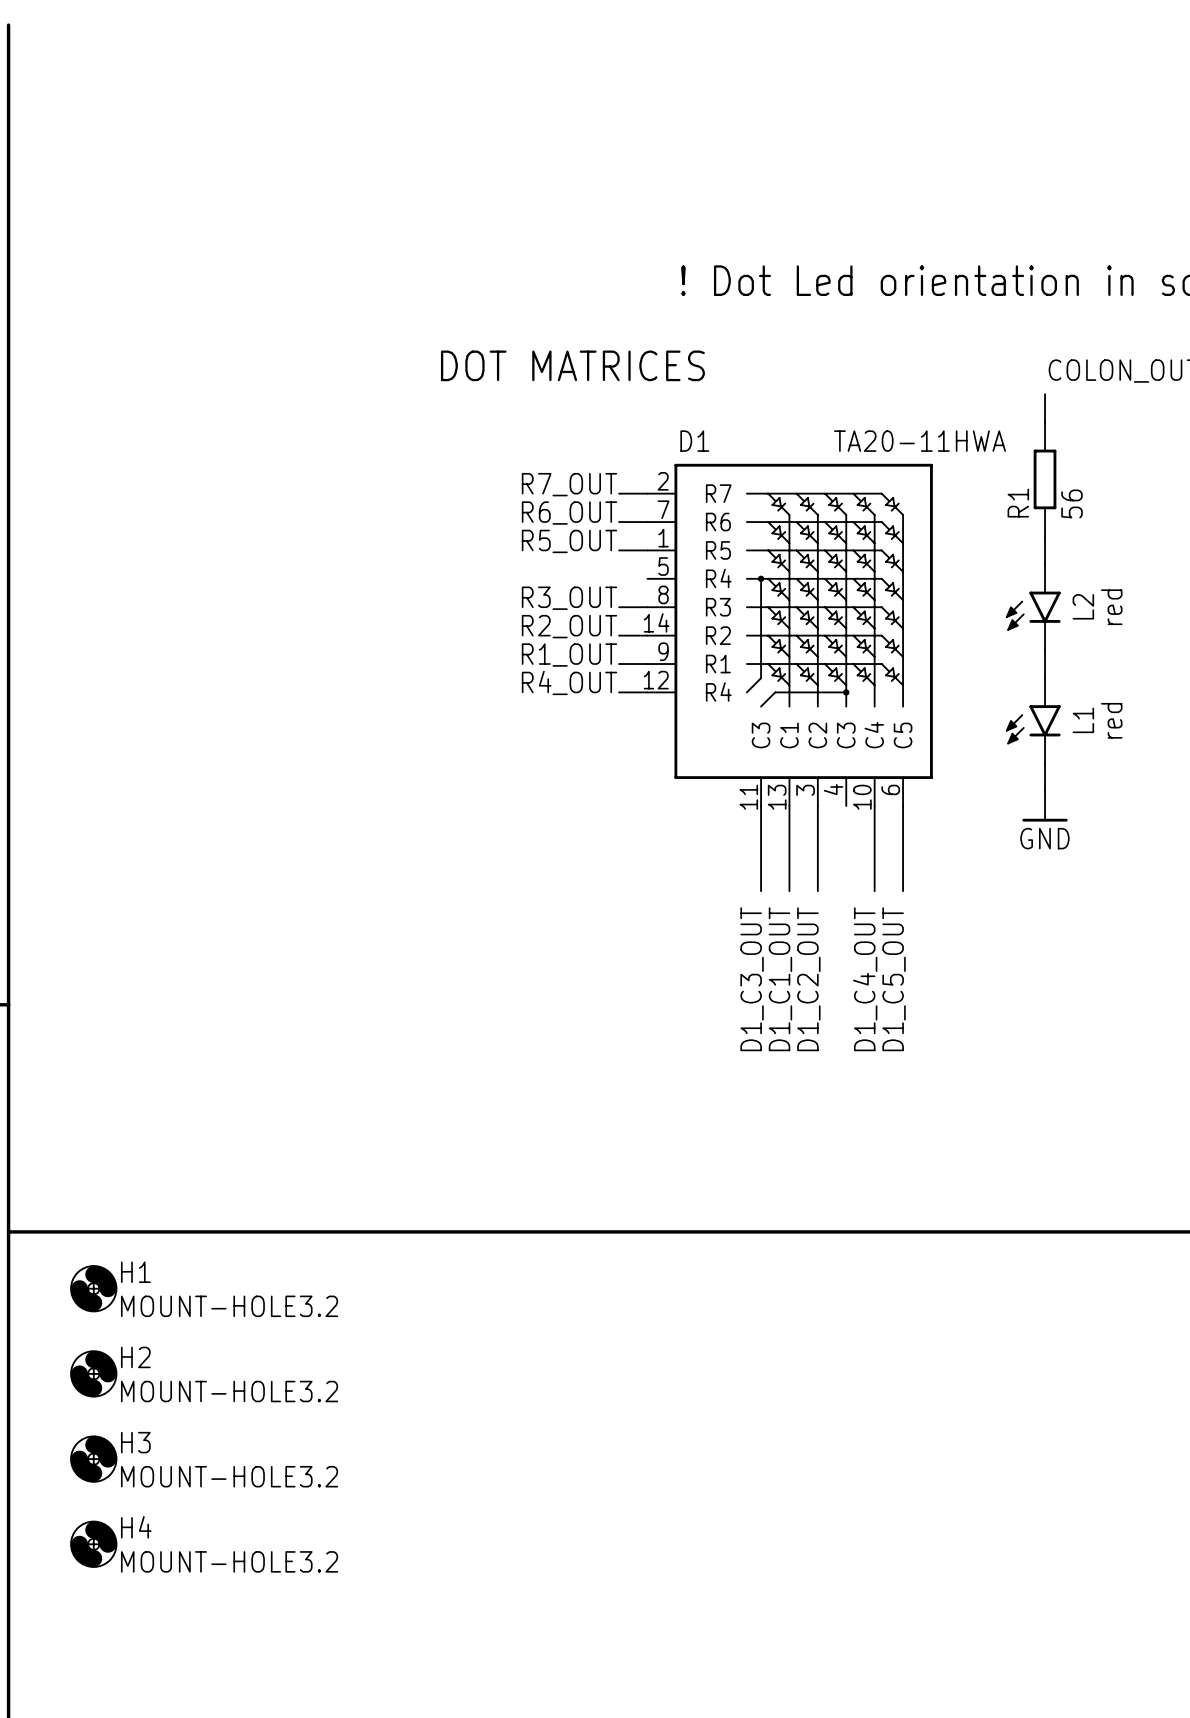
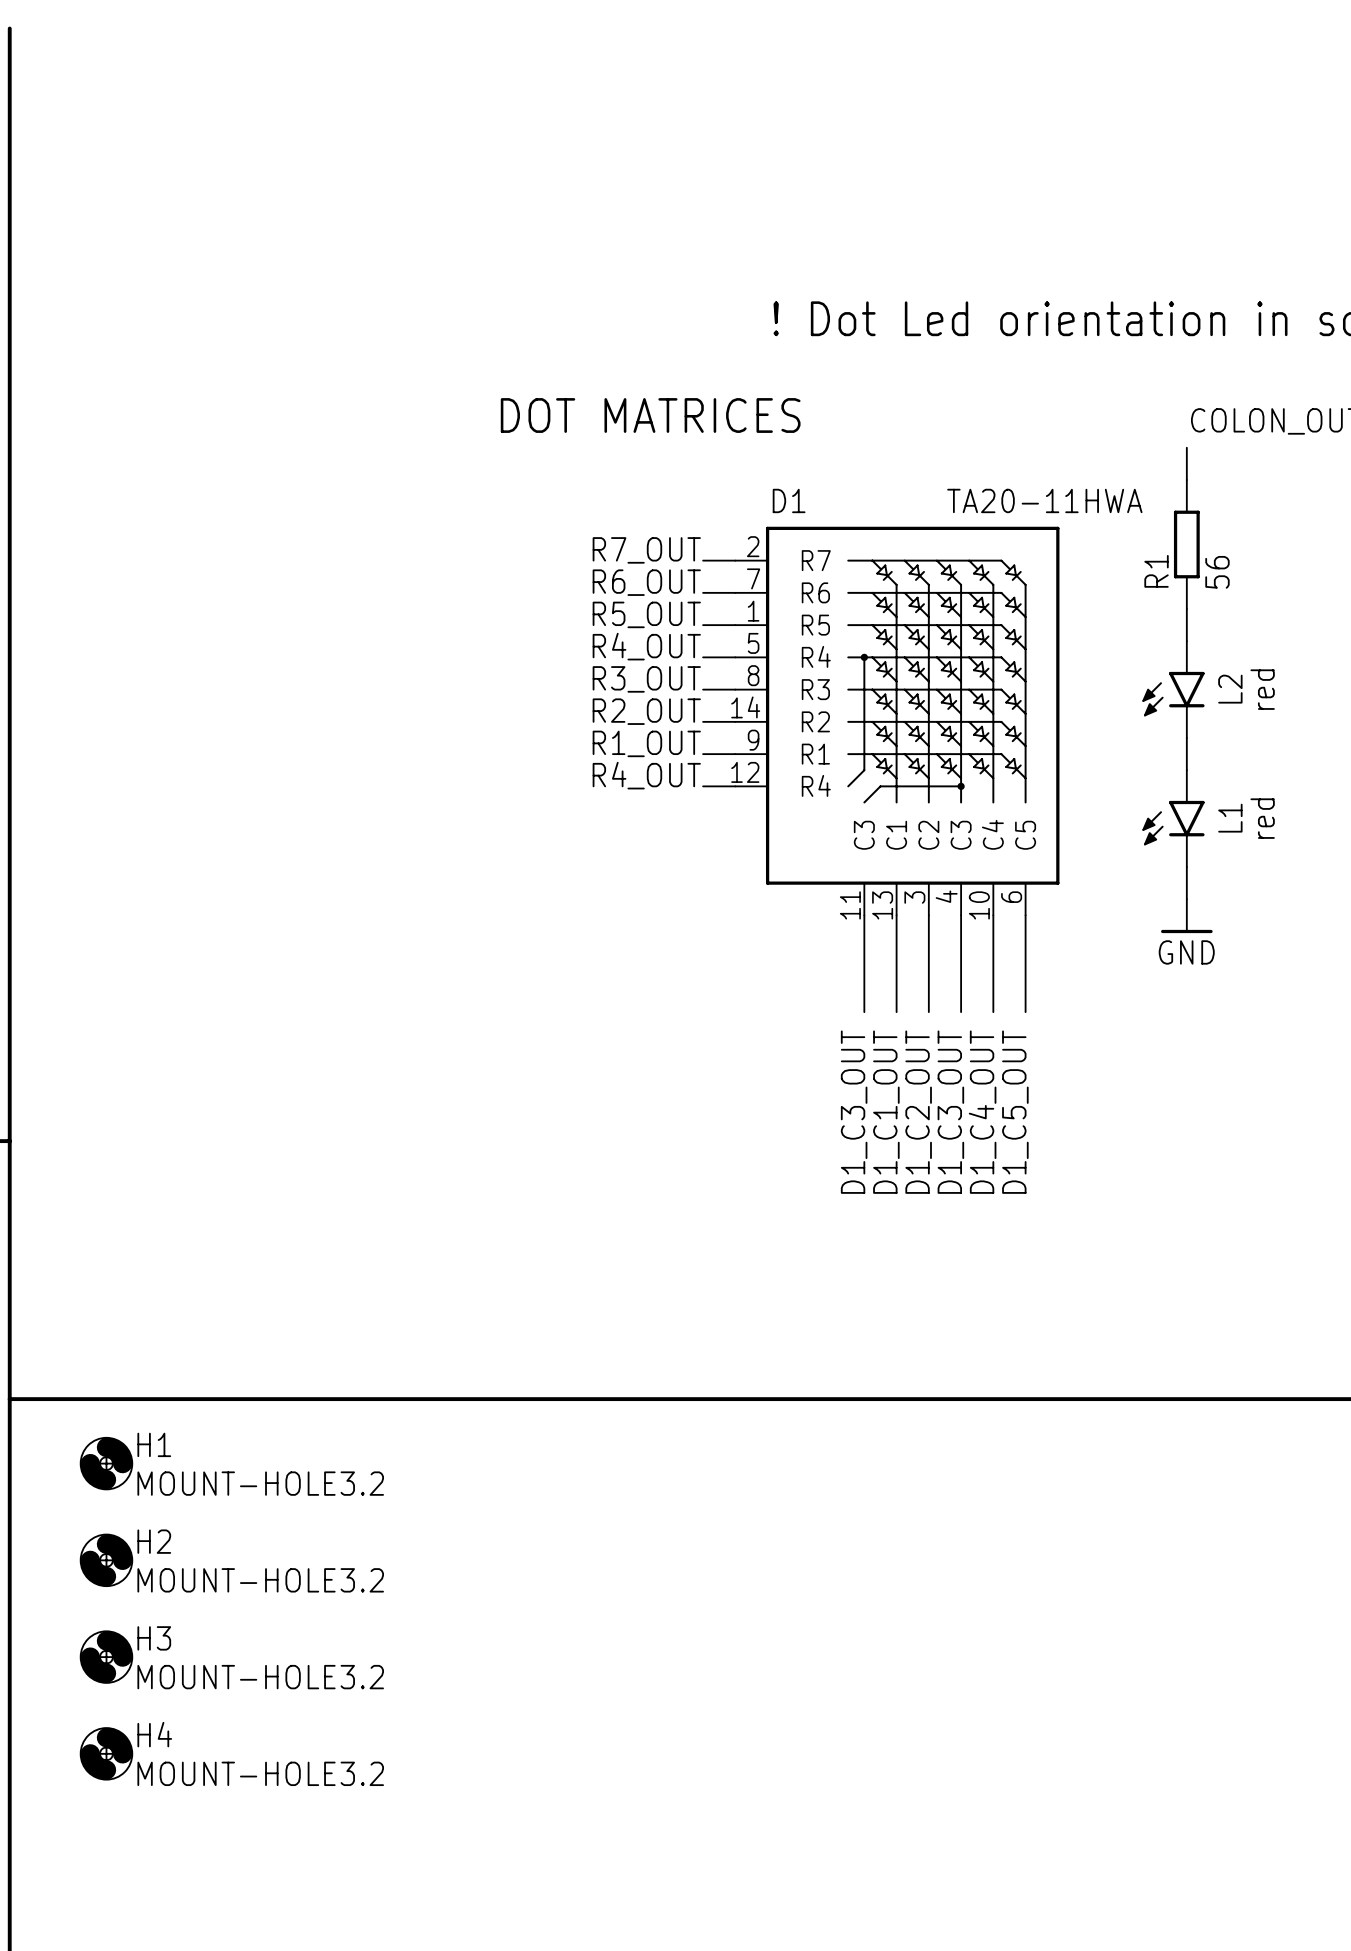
label: none -> R4_OUT (646, 646)
wire: none -> (703, 657) (735, 657)
wire: none -> (961, 915) (961, 1012)
label: none -> D1_C3_OUT (950, 1112)

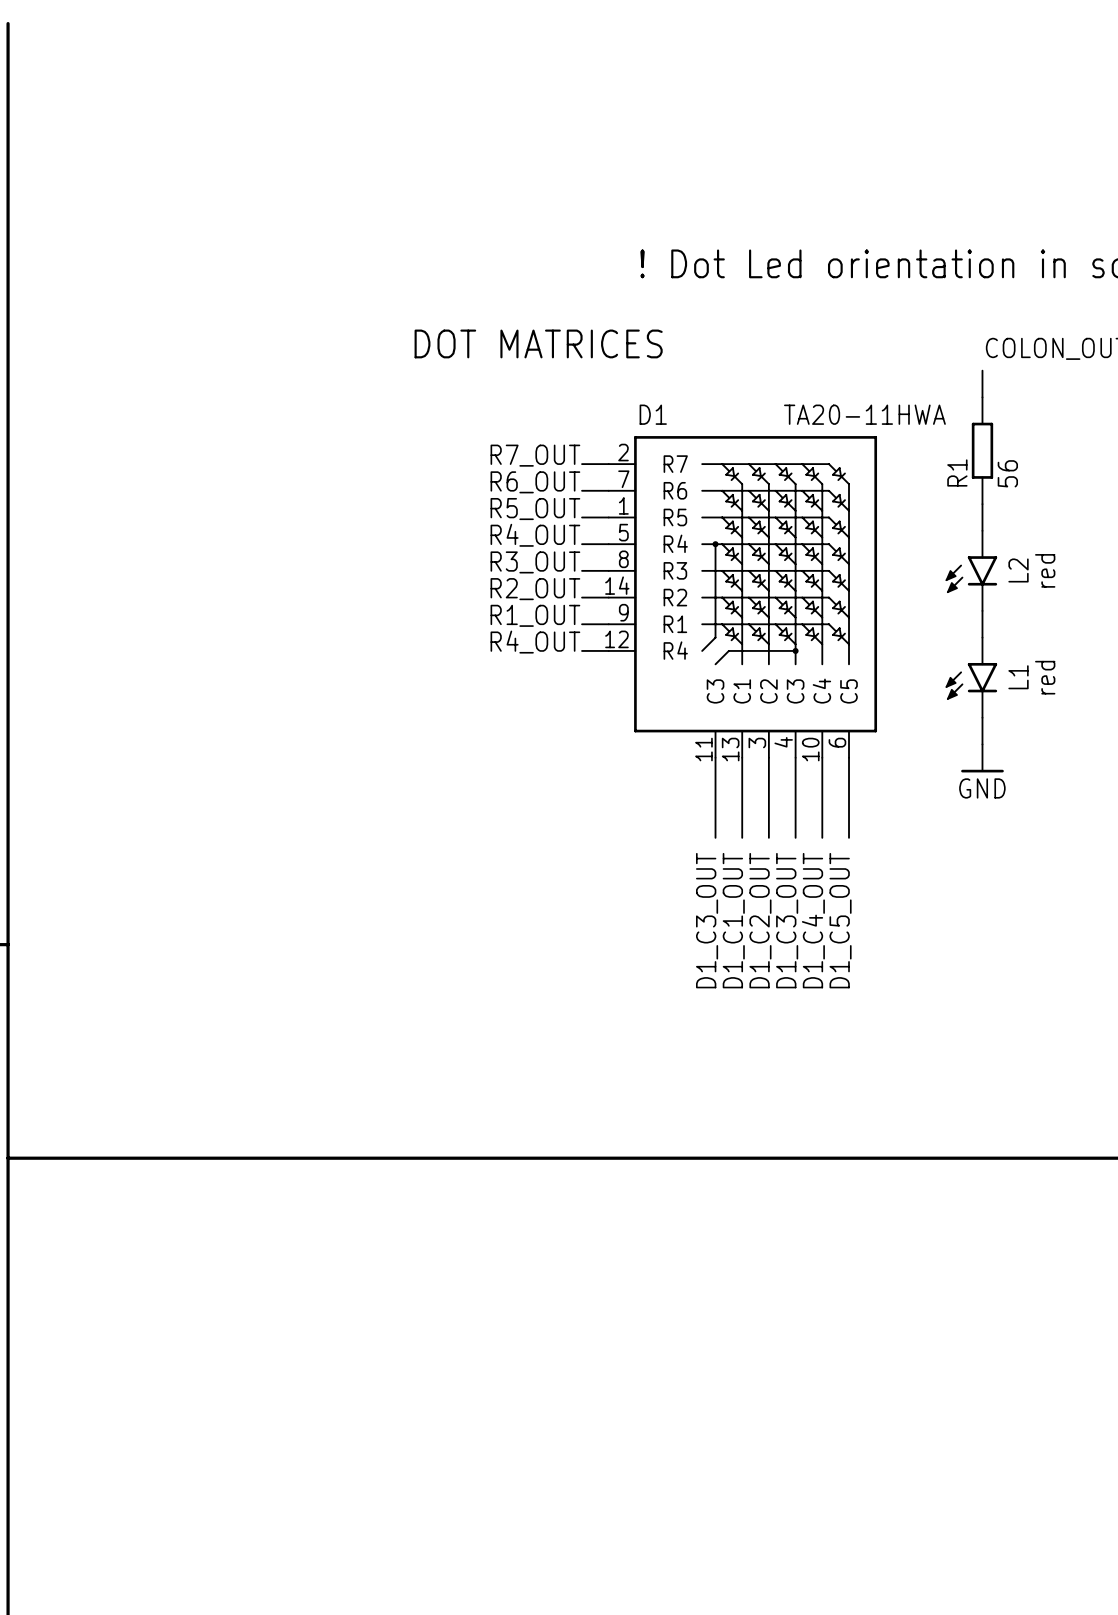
H1: MOUNT-HOLE3.2 (106, 1463) -> none
H2: MOUNT-HOLE3.2 (106, 1560) -> none
H3: MOUNT-HOLE3.2 (106, 1657) -> none
H4: MOUNT-HOLE3.2 (106, 1753) -> none

